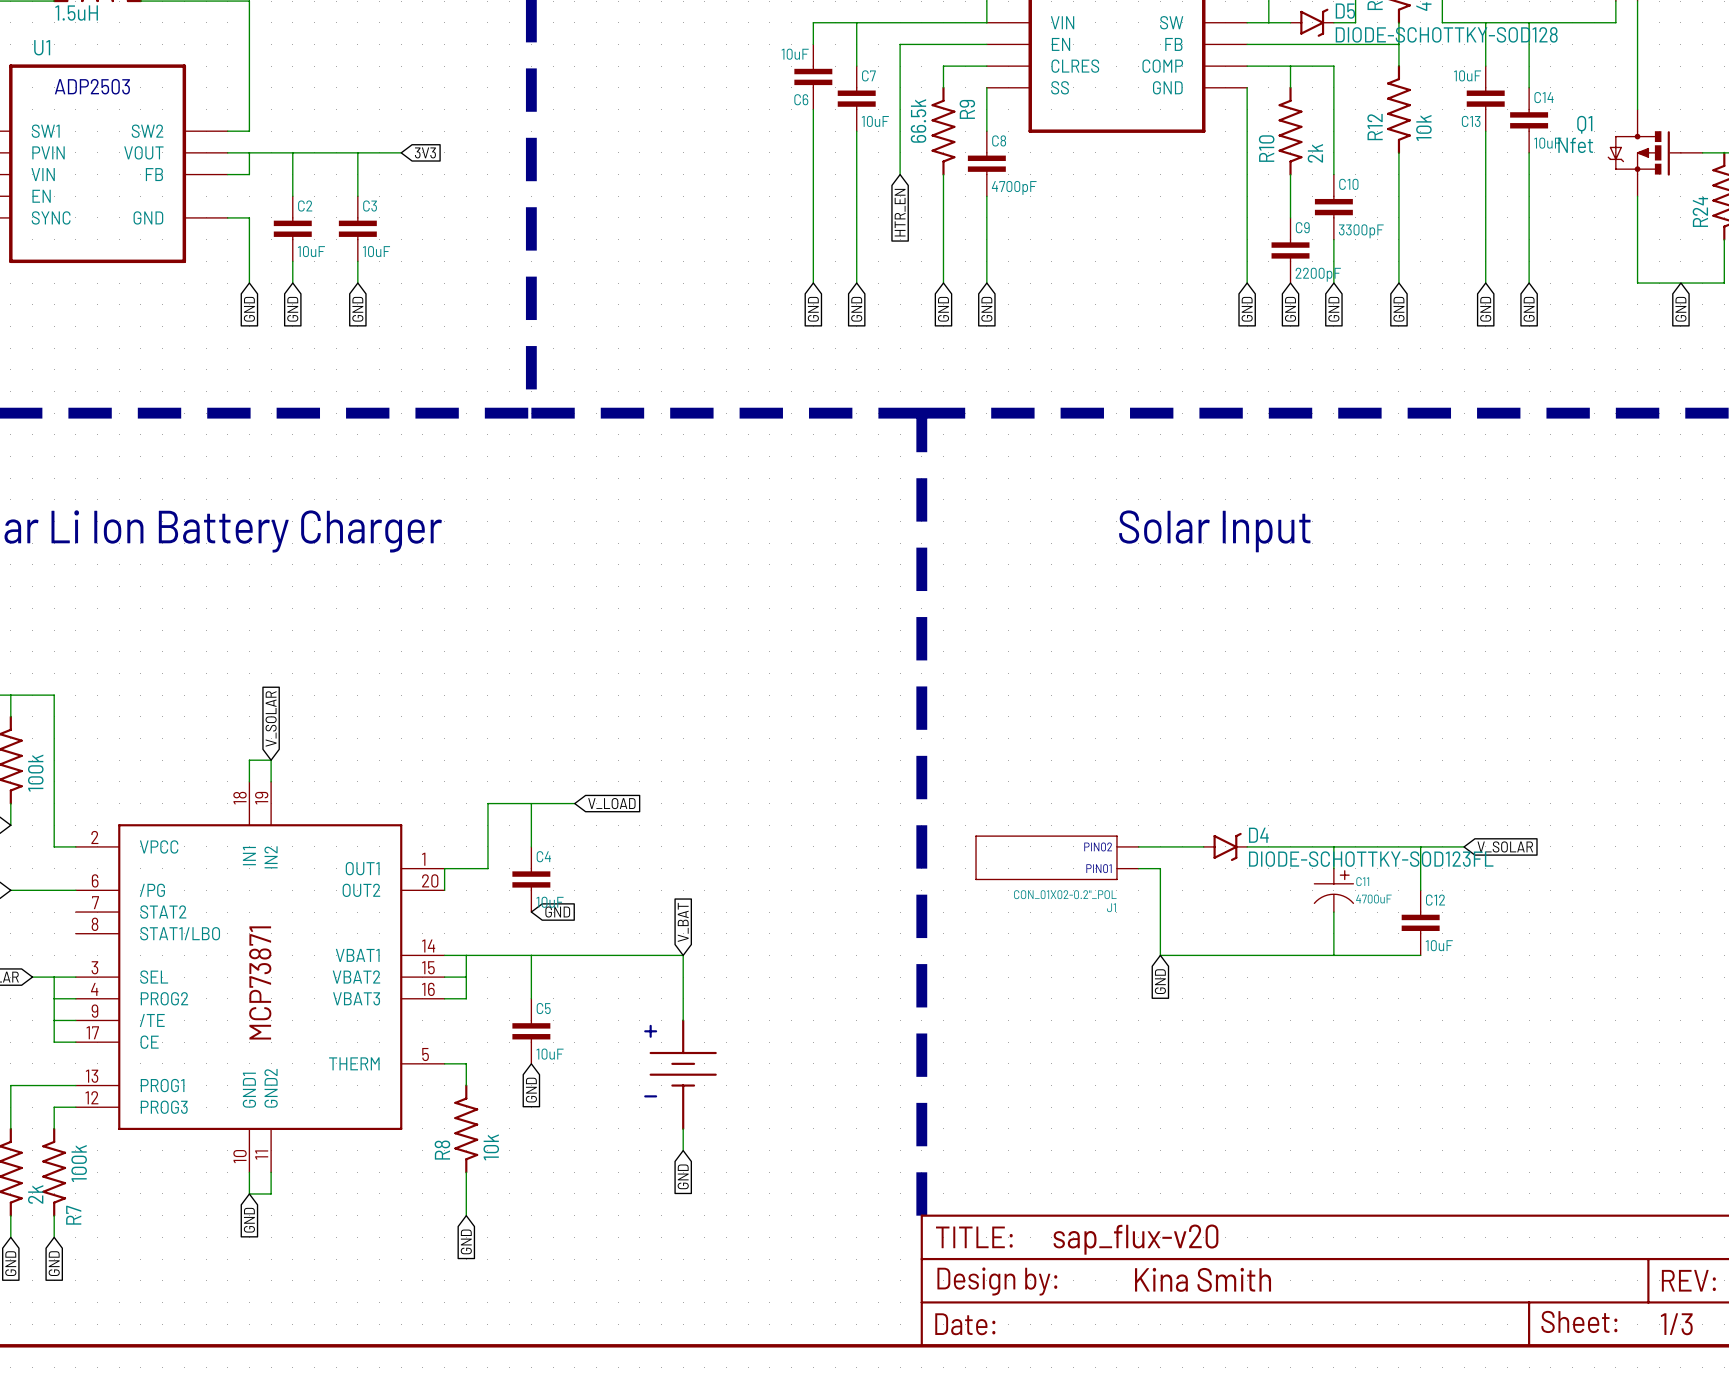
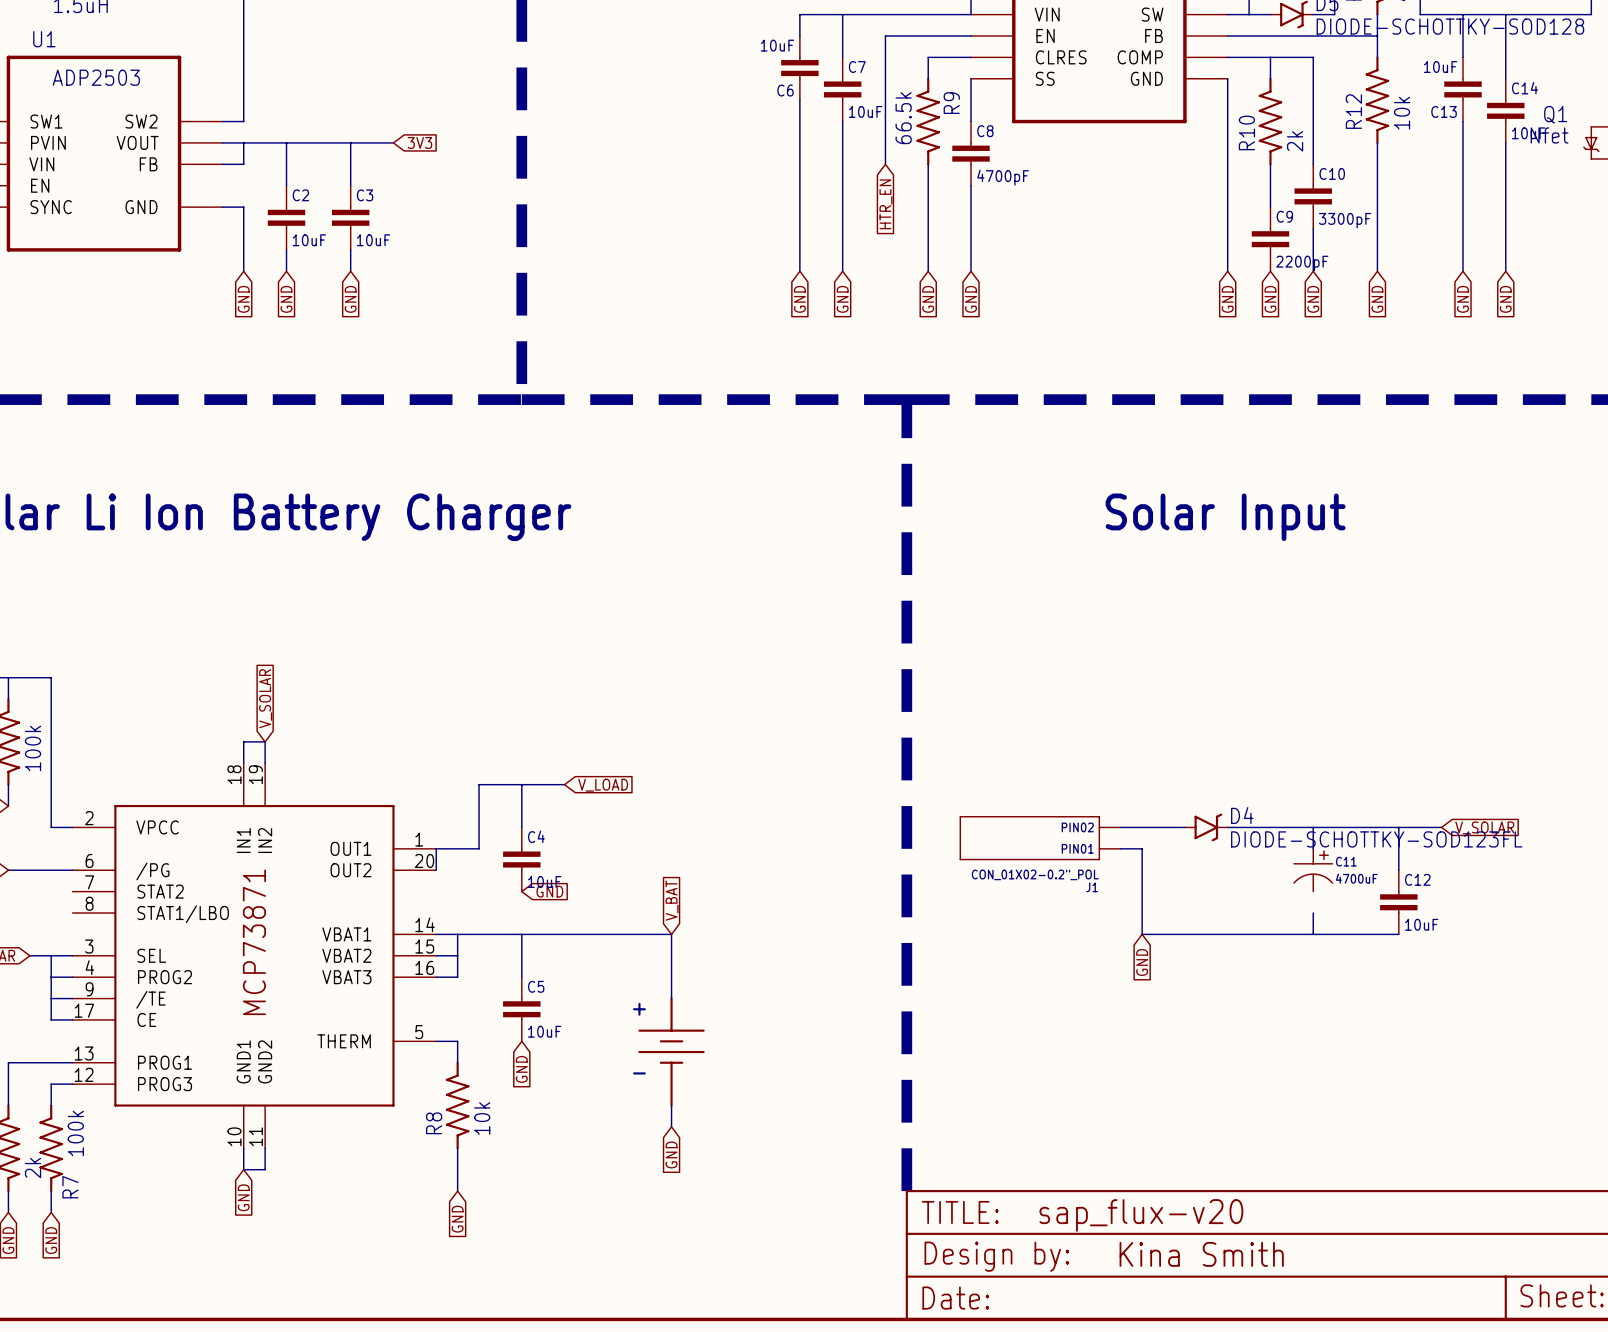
wire: (1333, 912) (1333, 933) -> none

